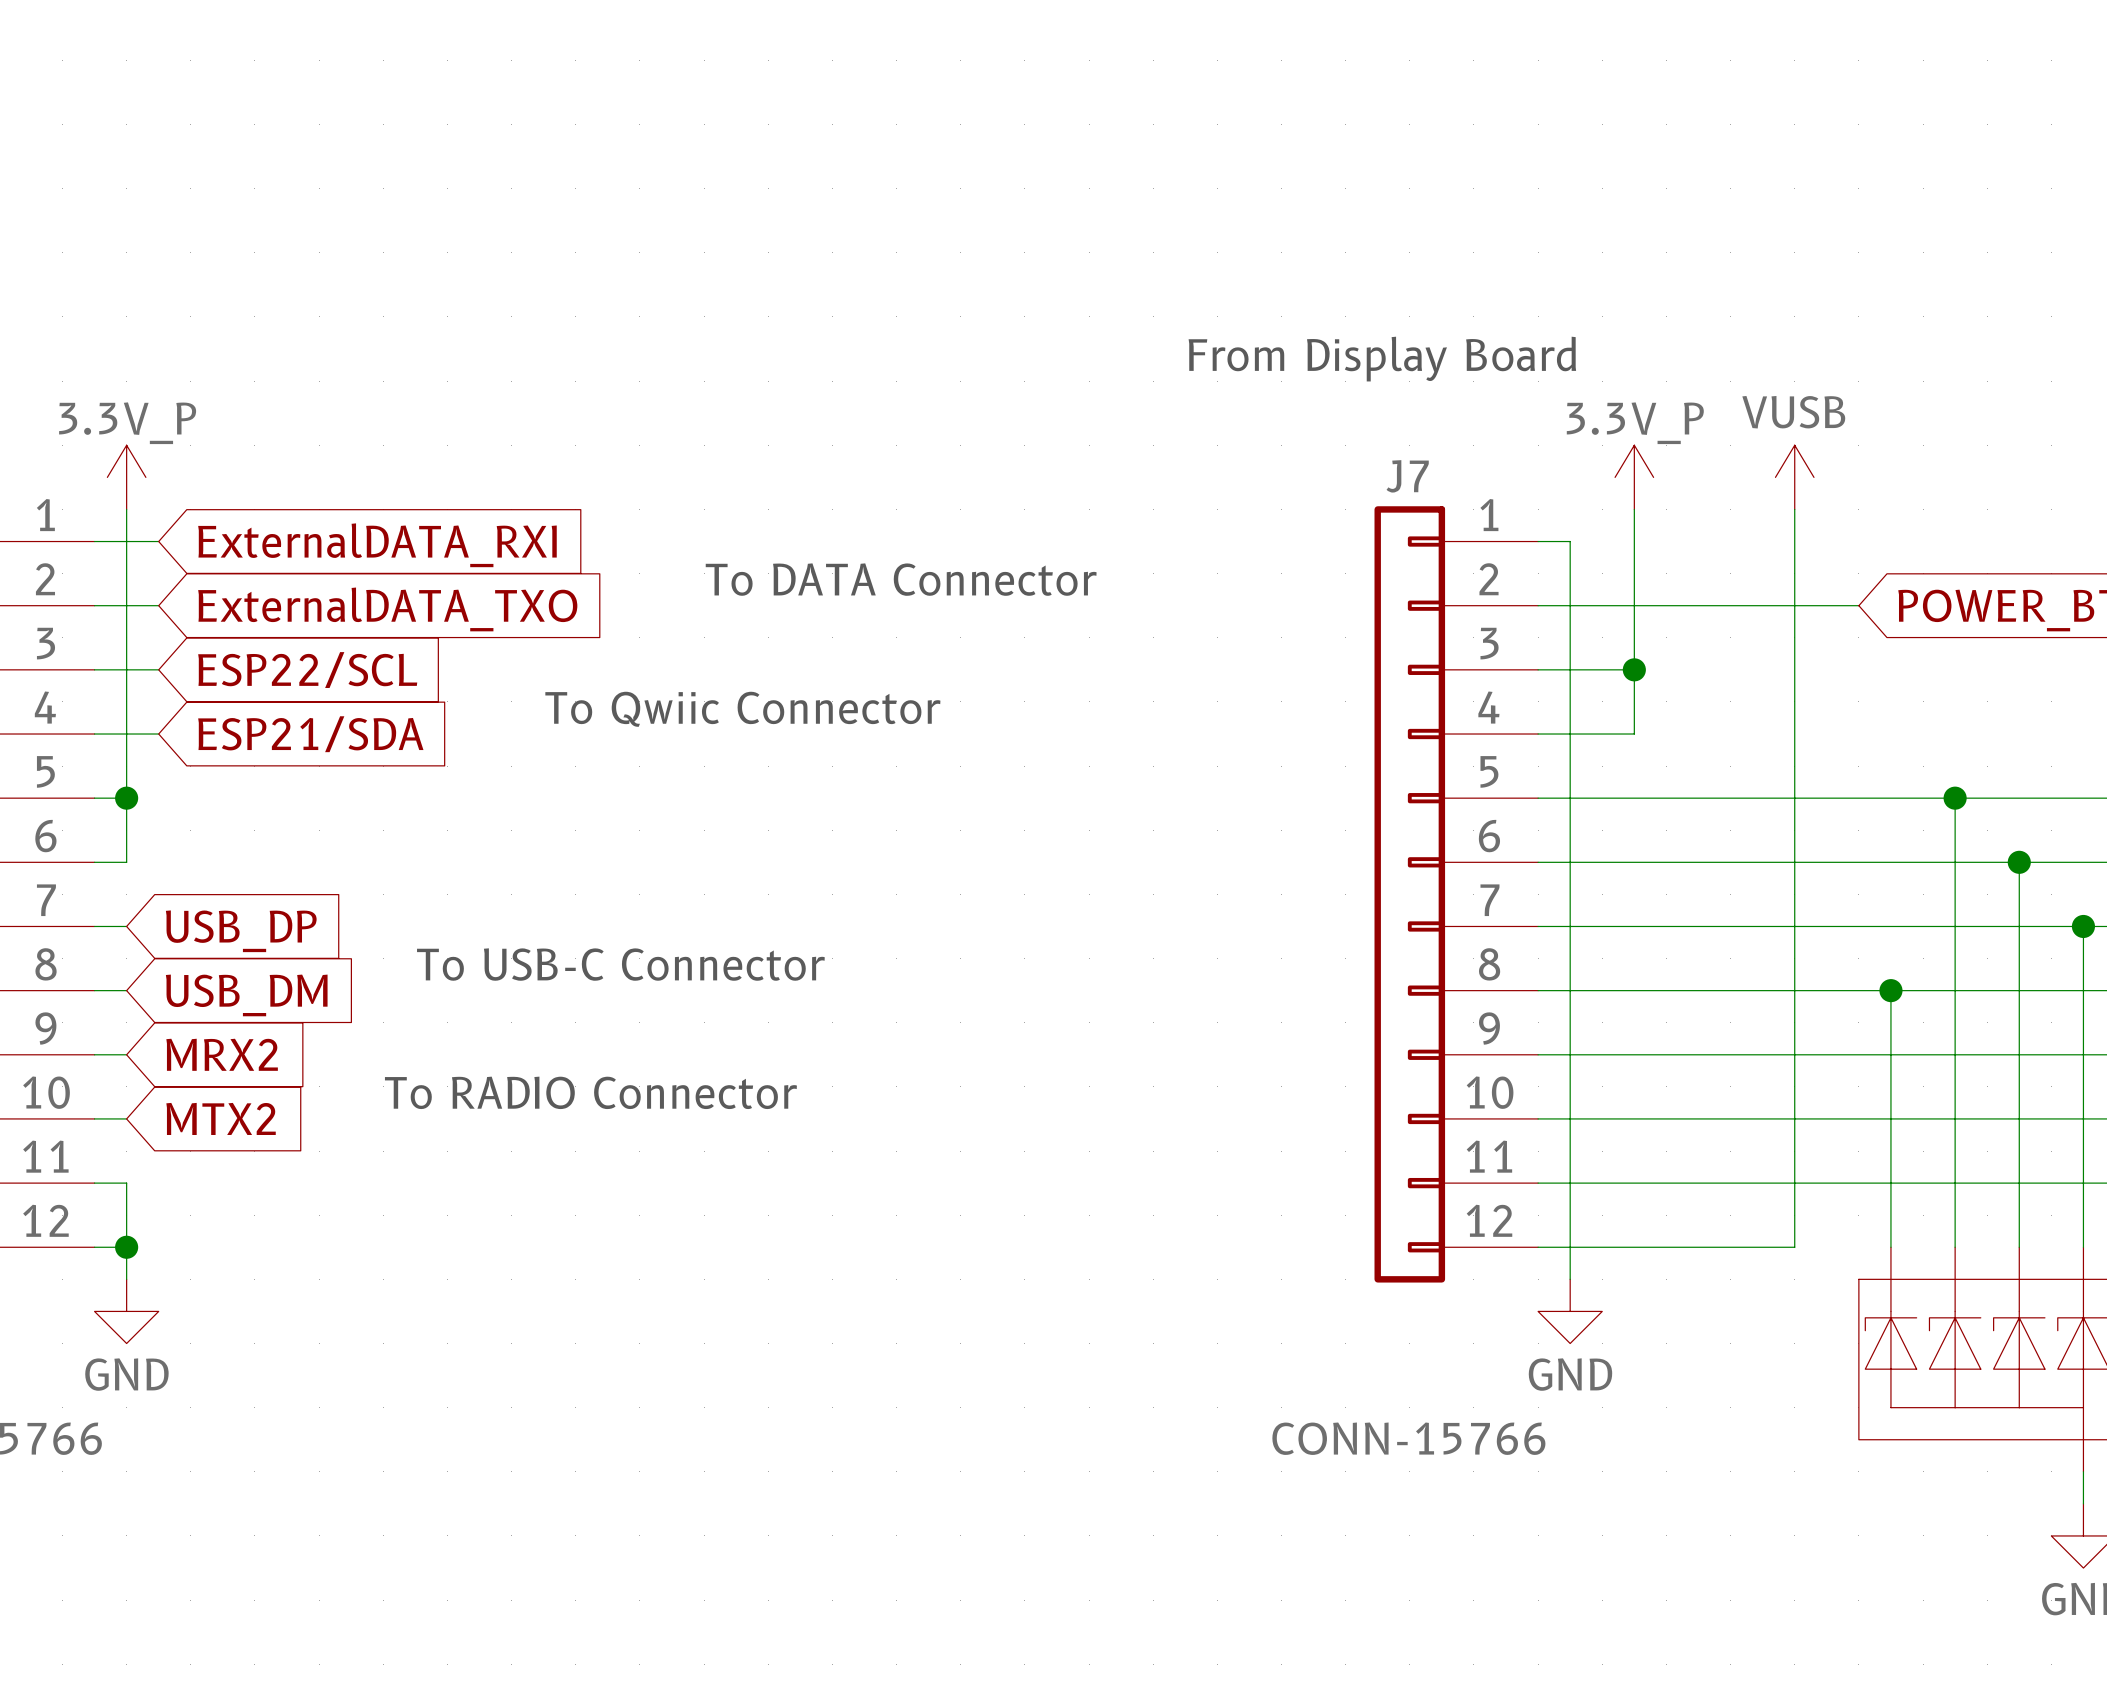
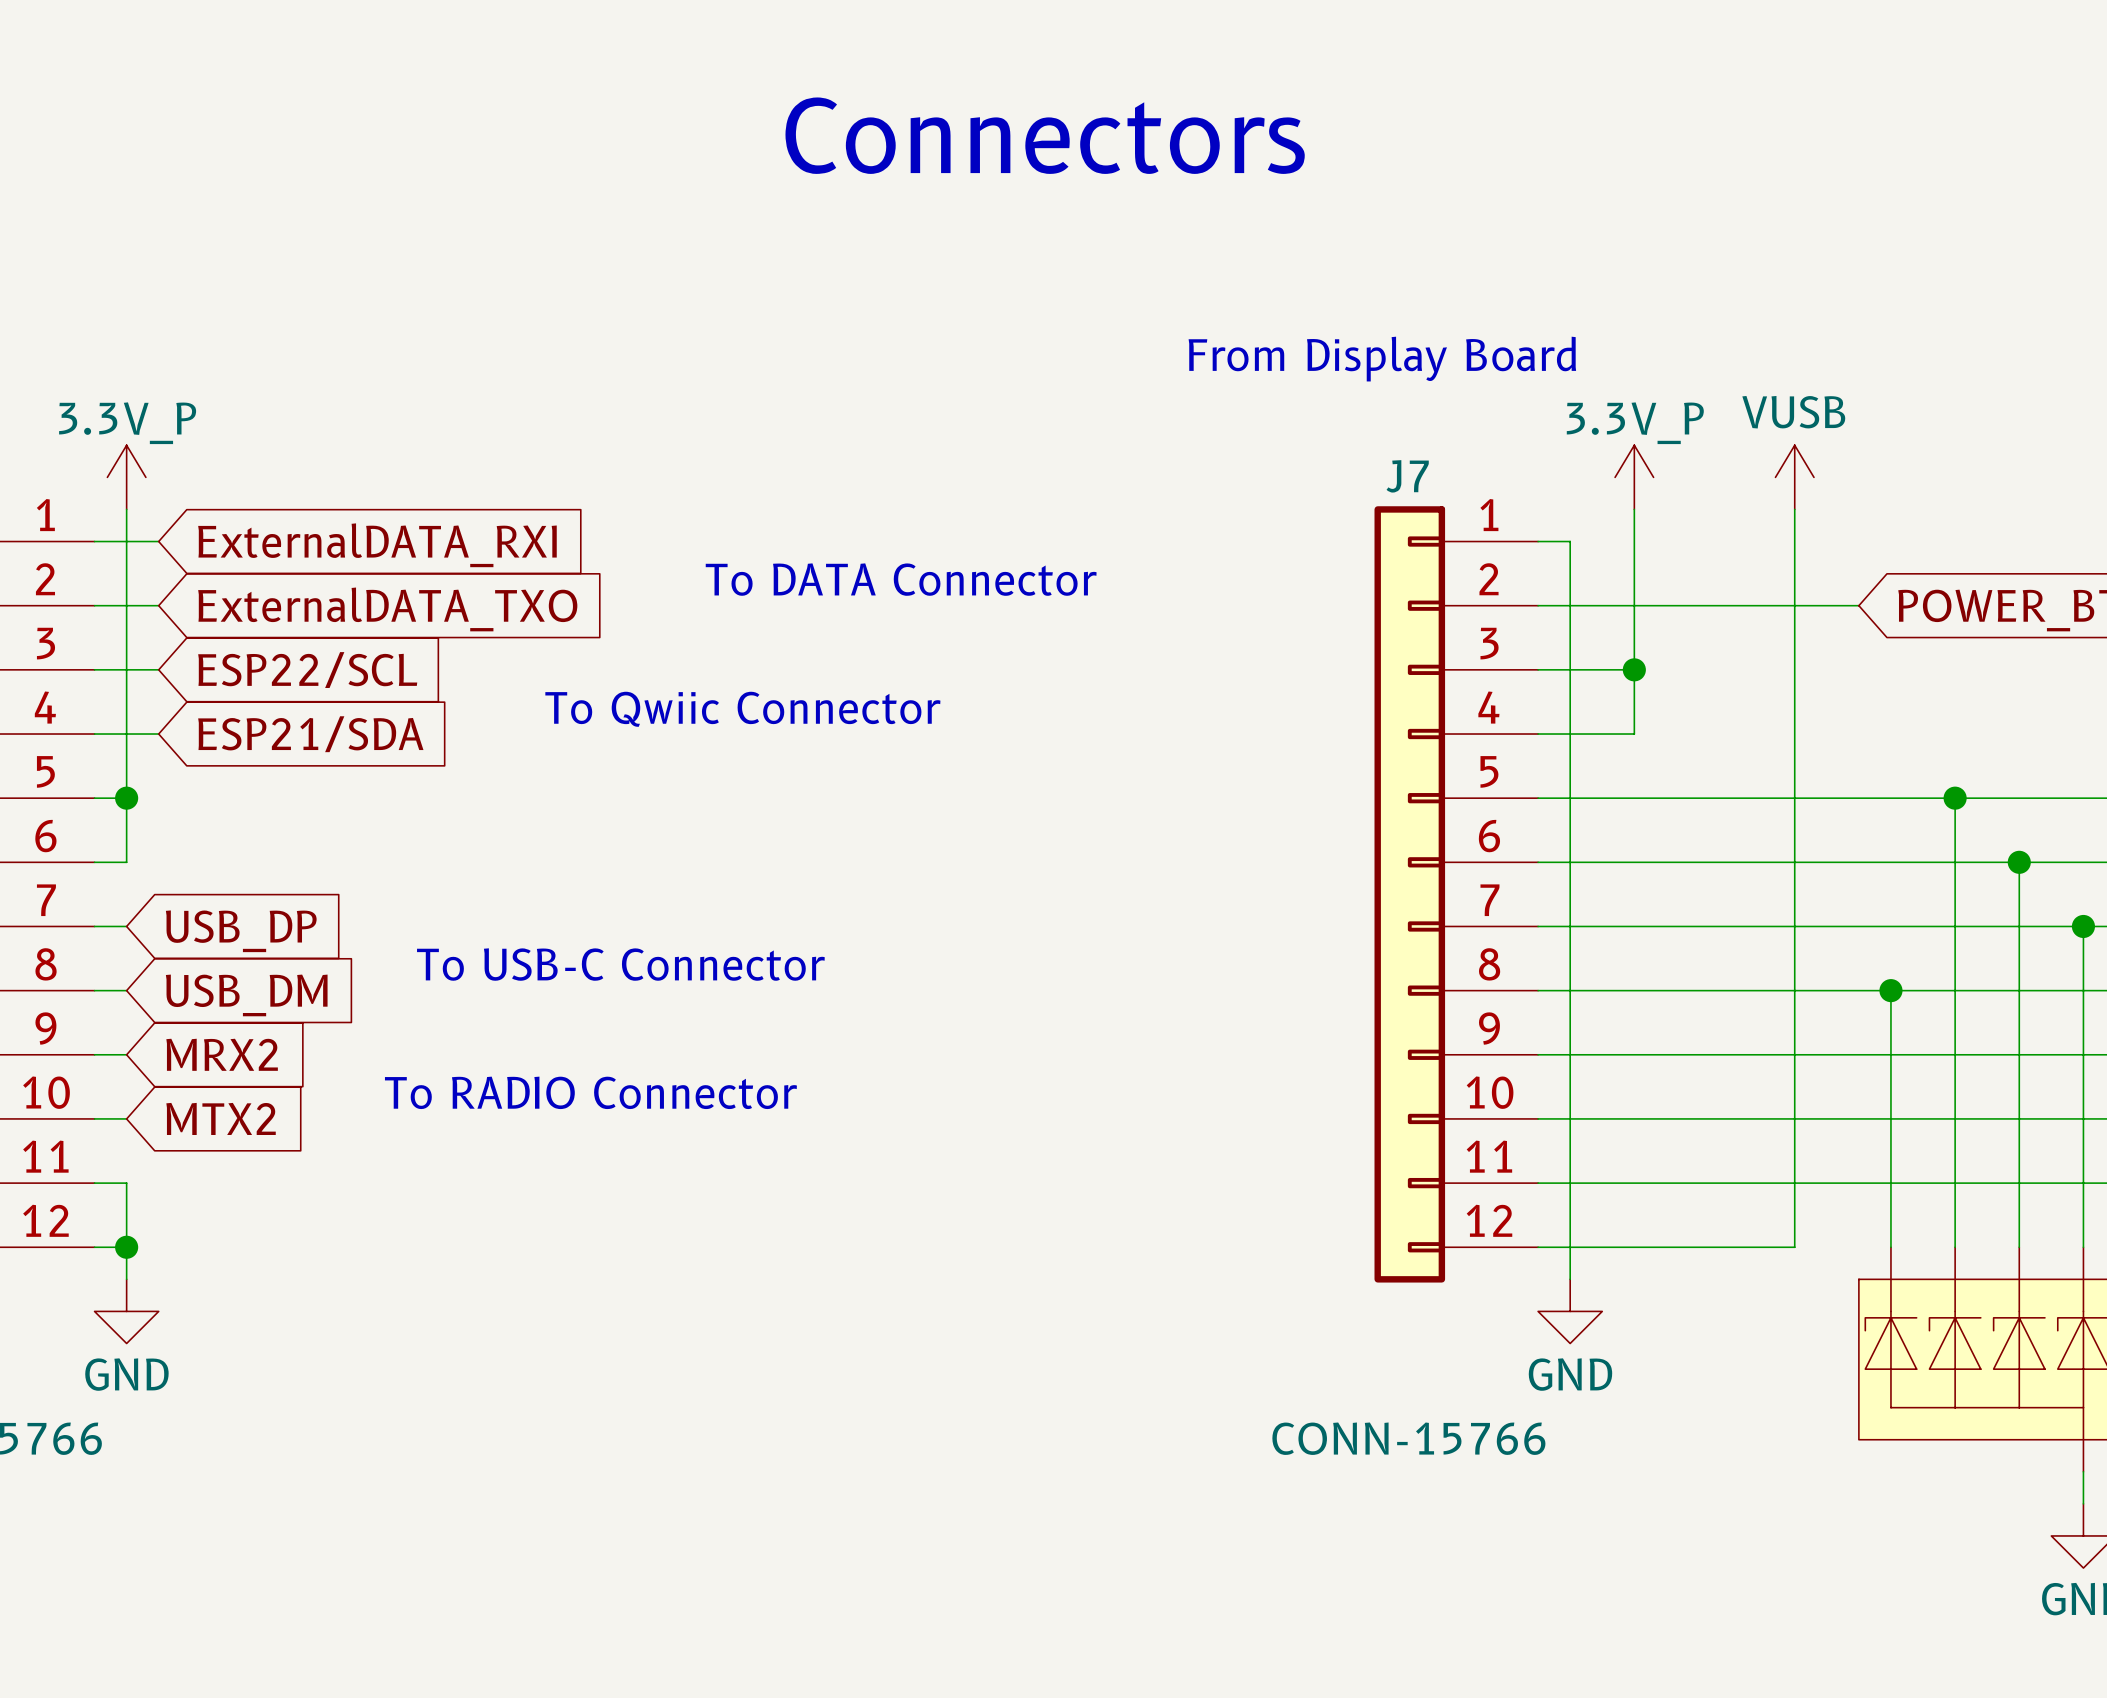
text: none -> Connectors (1045, 135)

